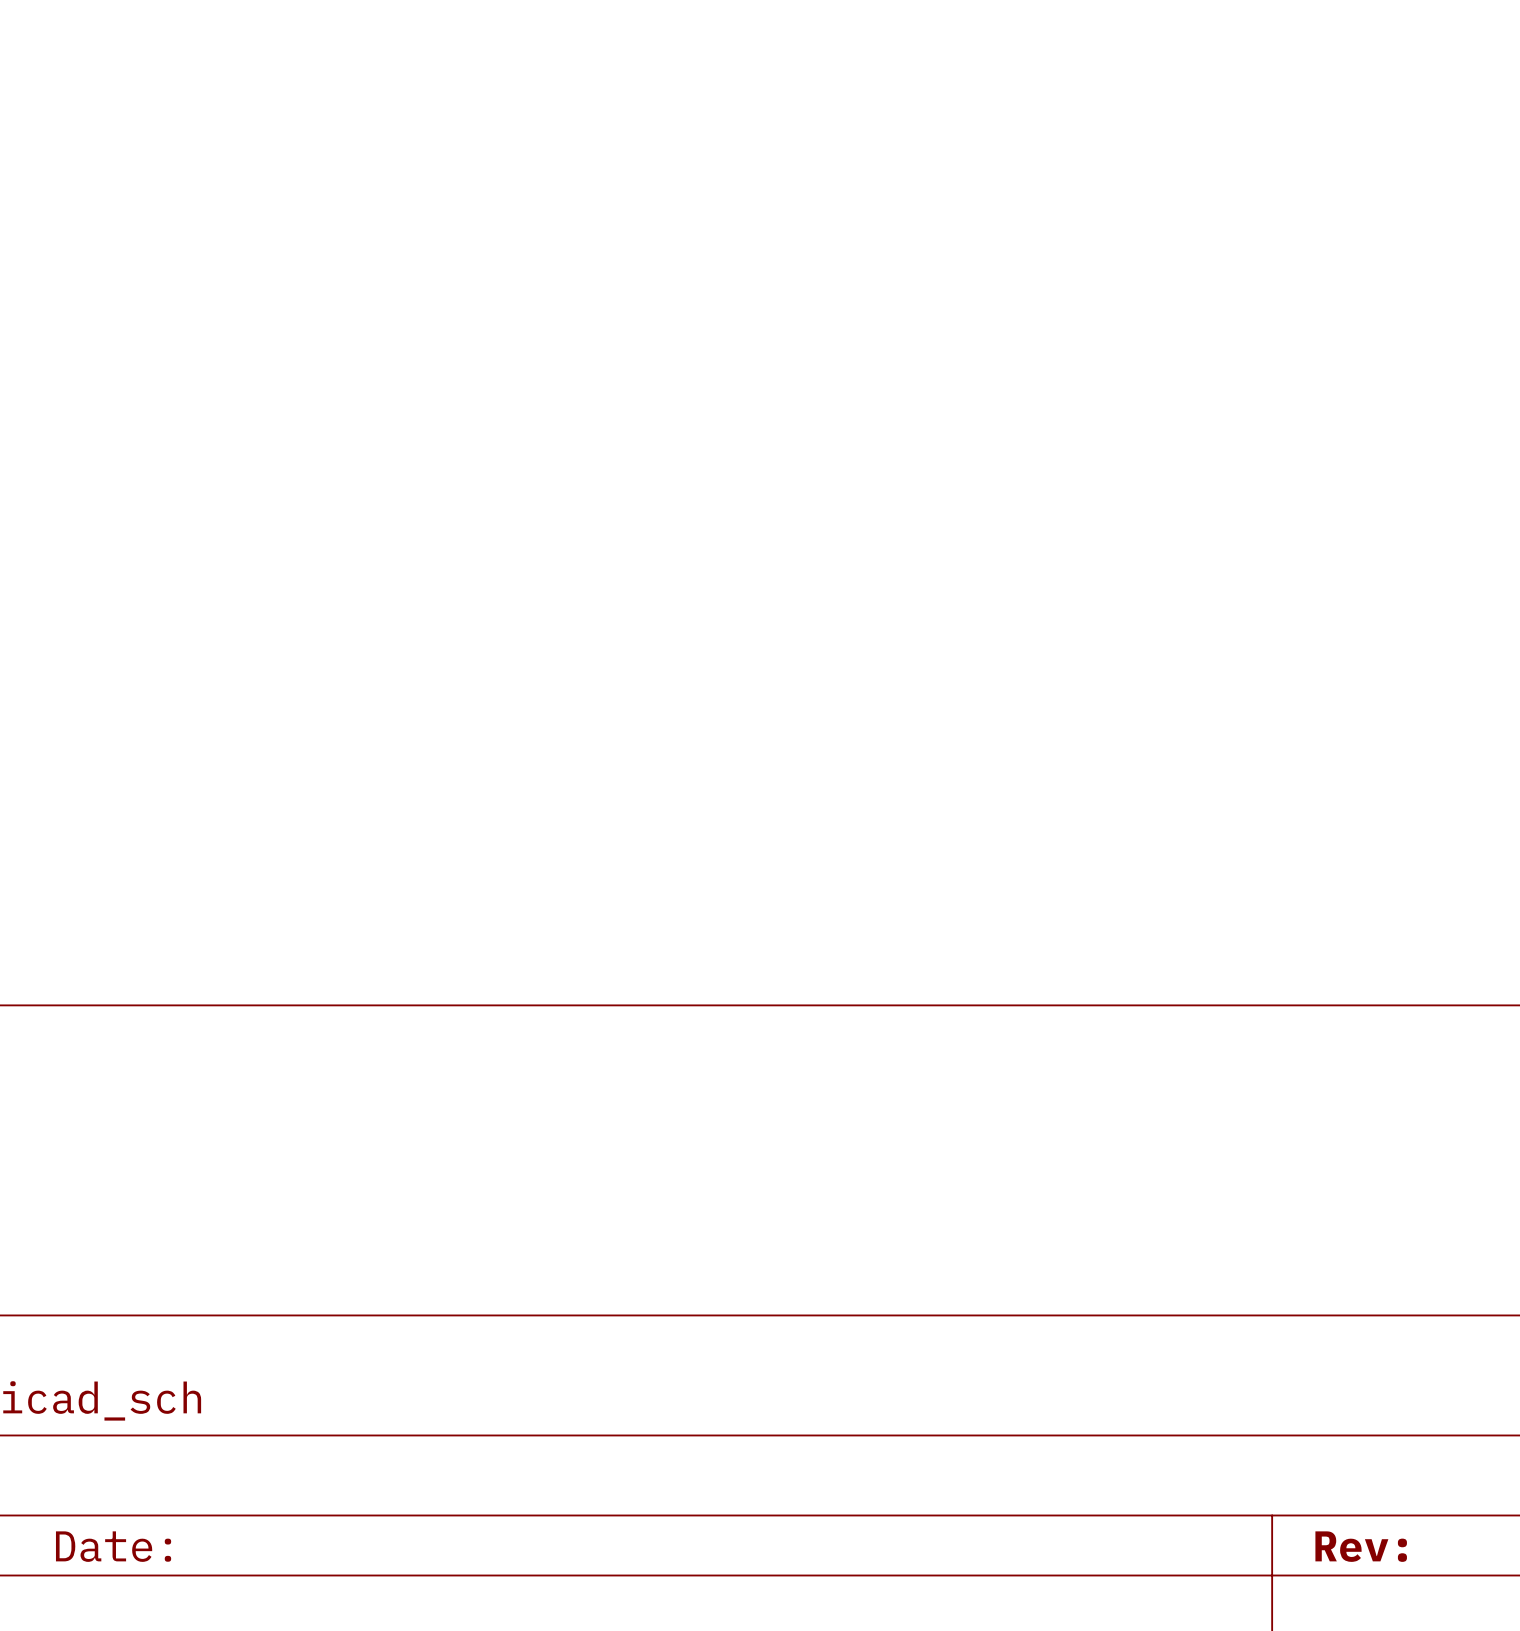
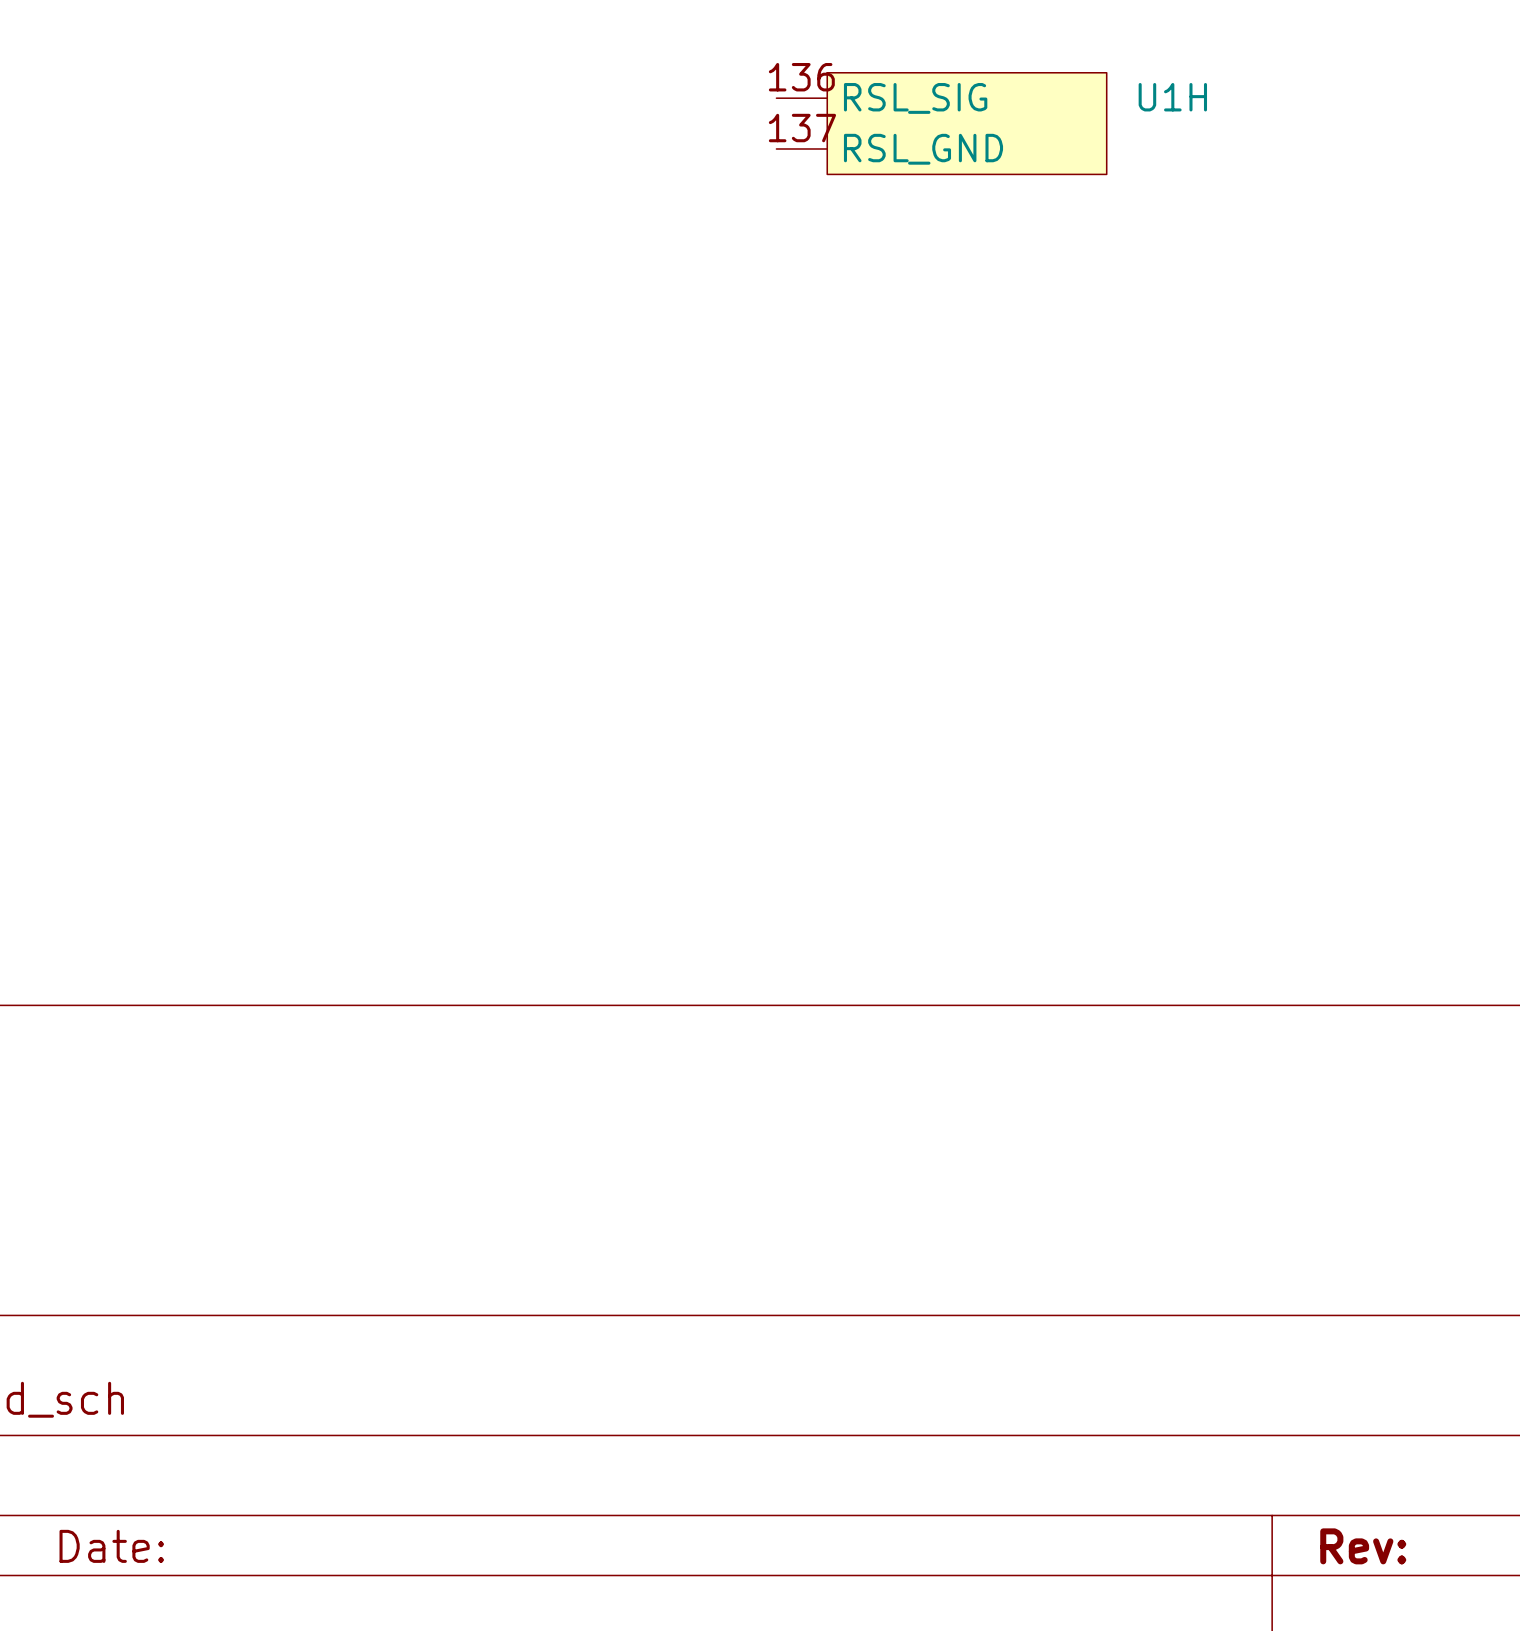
U1H: none -> (941, 123)

